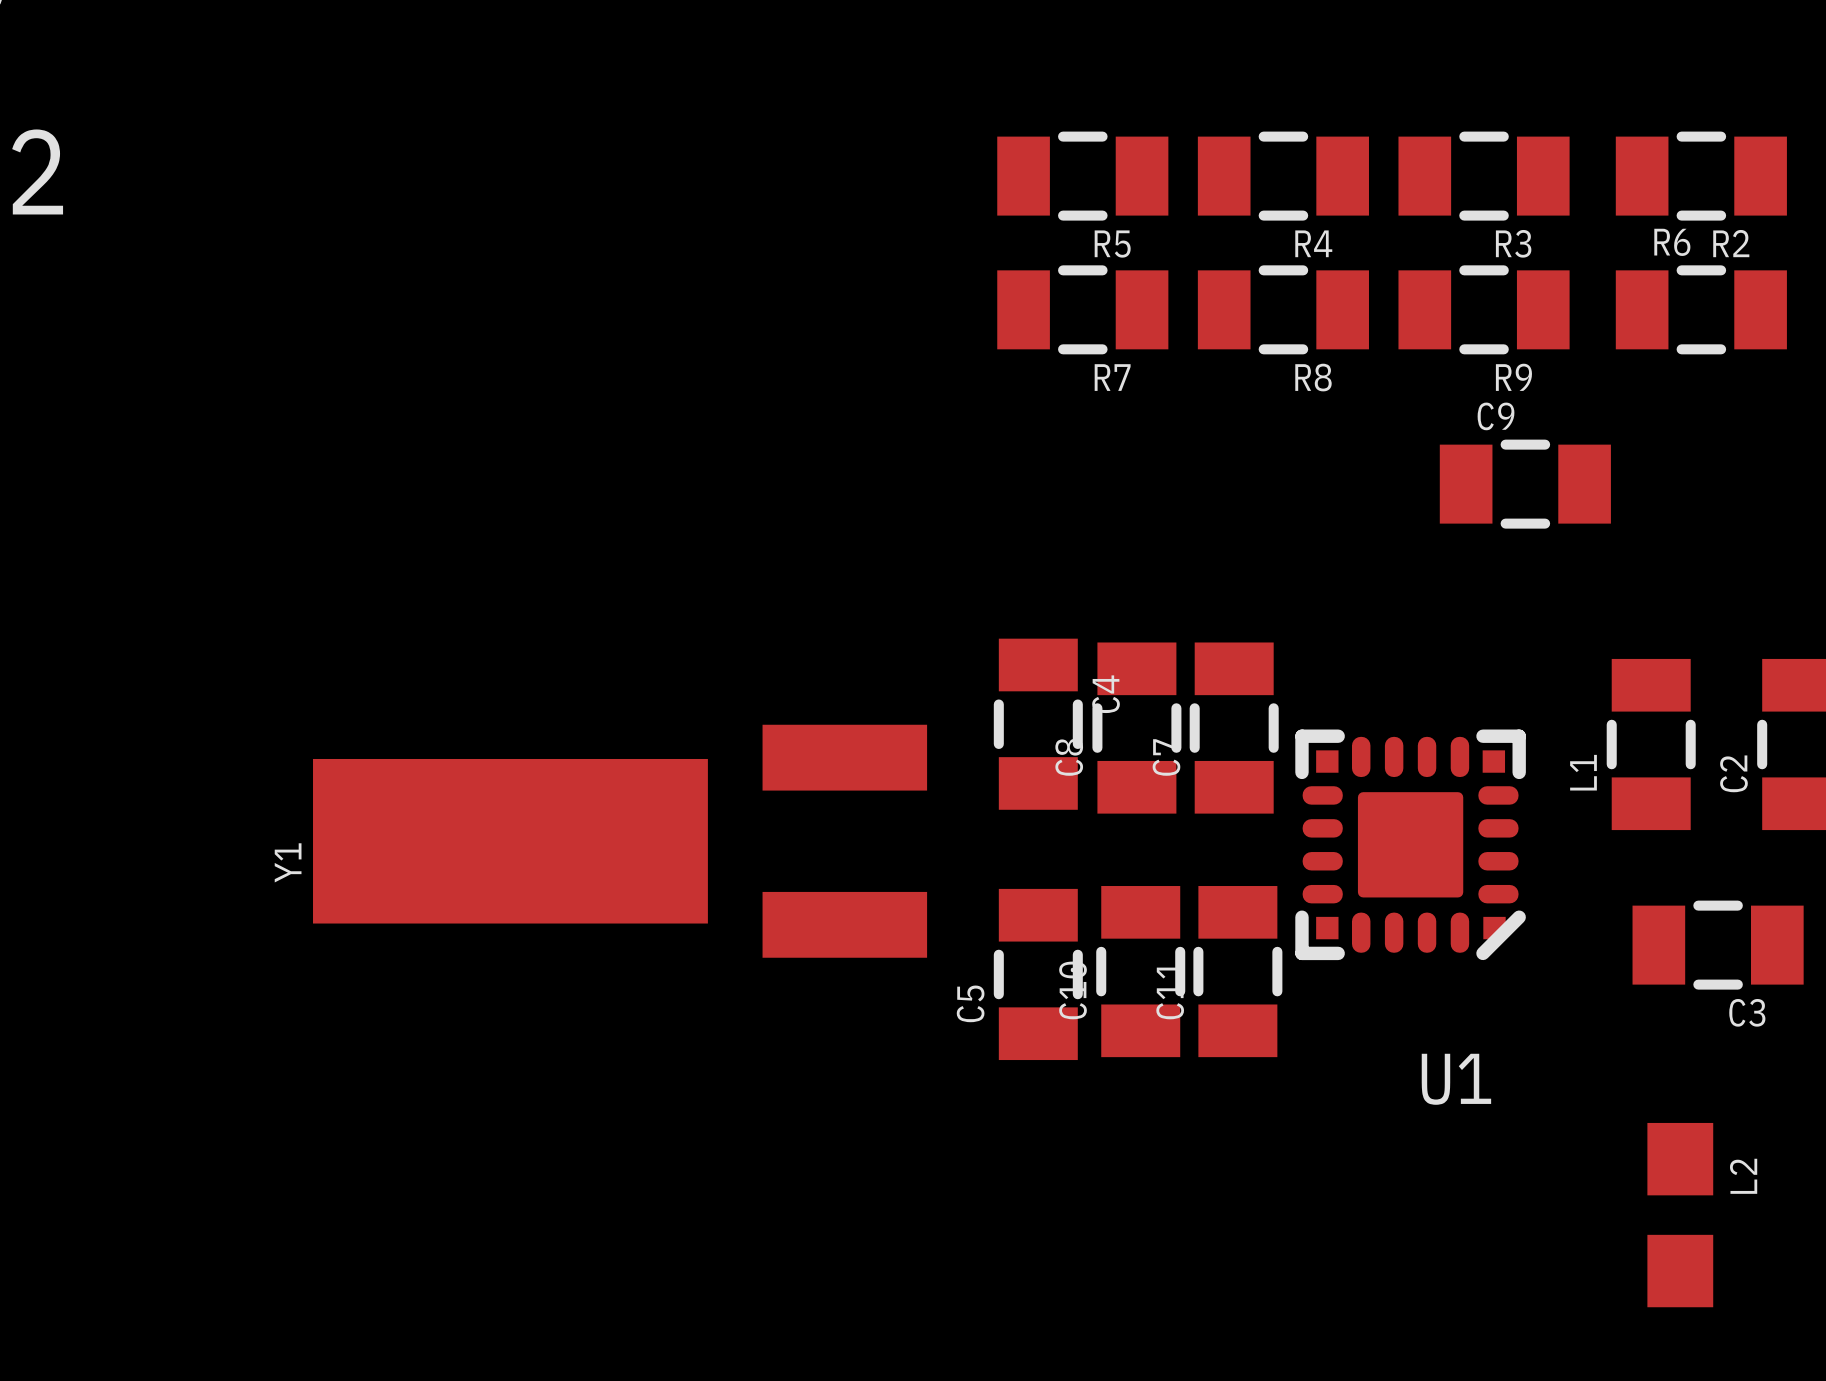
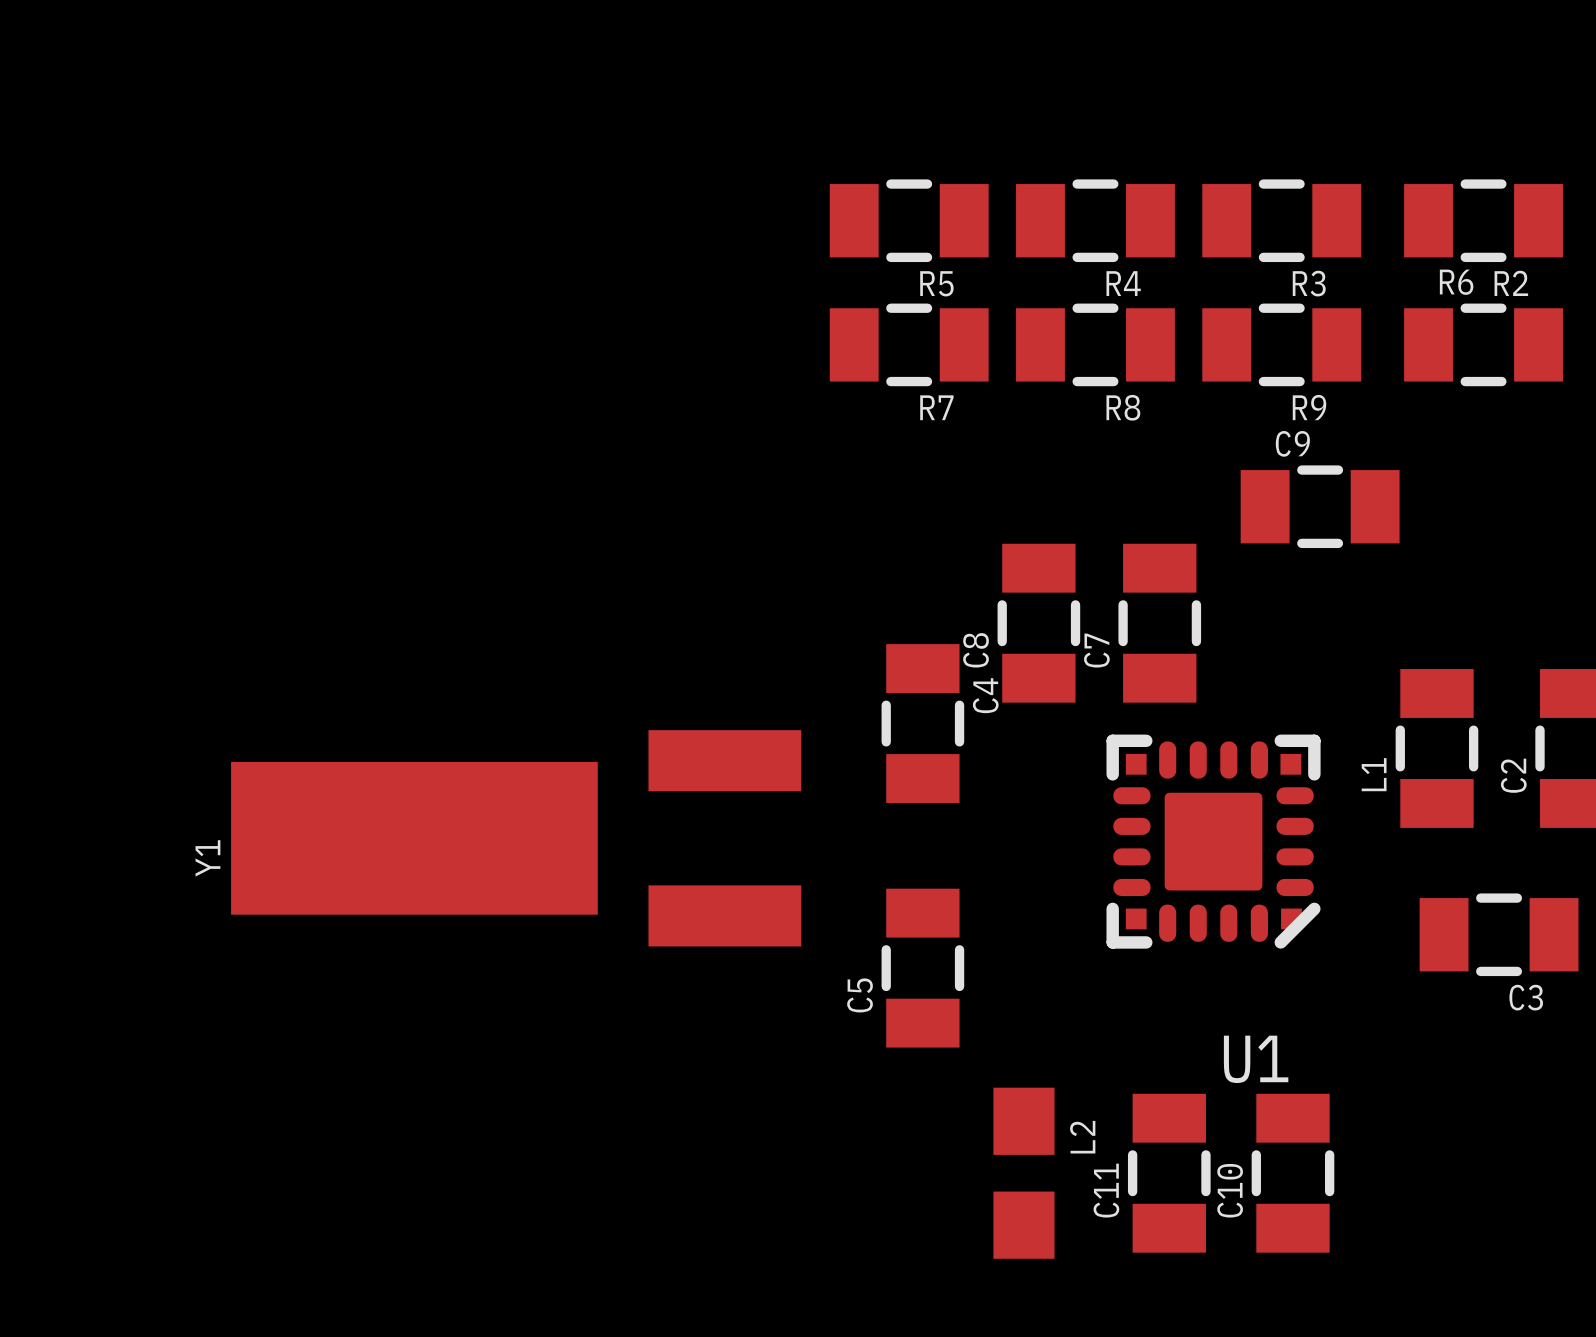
C4 position: (1038, 724) -> (922, 723)
C8 position: (1136, 728) -> (1038, 623)
C7 position: (1234, 728) -> (1159, 623)
Y1 position: (620, 841) -> (516, 838)
C10 position: (1140, 971) -> (1292, 1173)
C11 position: (1237, 971) -> (1169, 1173)
C5 position: (1038, 974) -> (922, 968)
L2 position: (1680, 1215) -> (1023, 1173)

